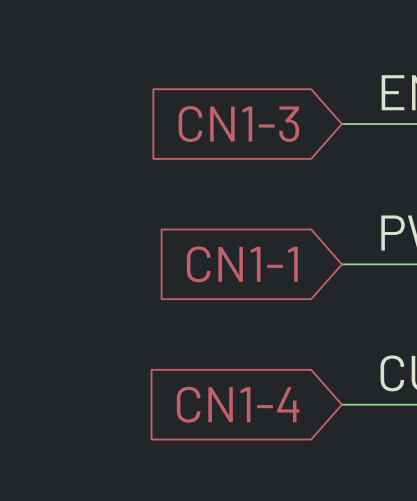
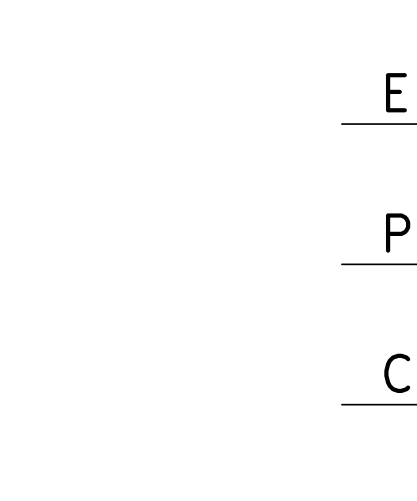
global label: CN1-3 (238, 124) -> none
global label: CN1-1 (242, 264) -> none
global label: CN1-4 (238, 404) -> none

